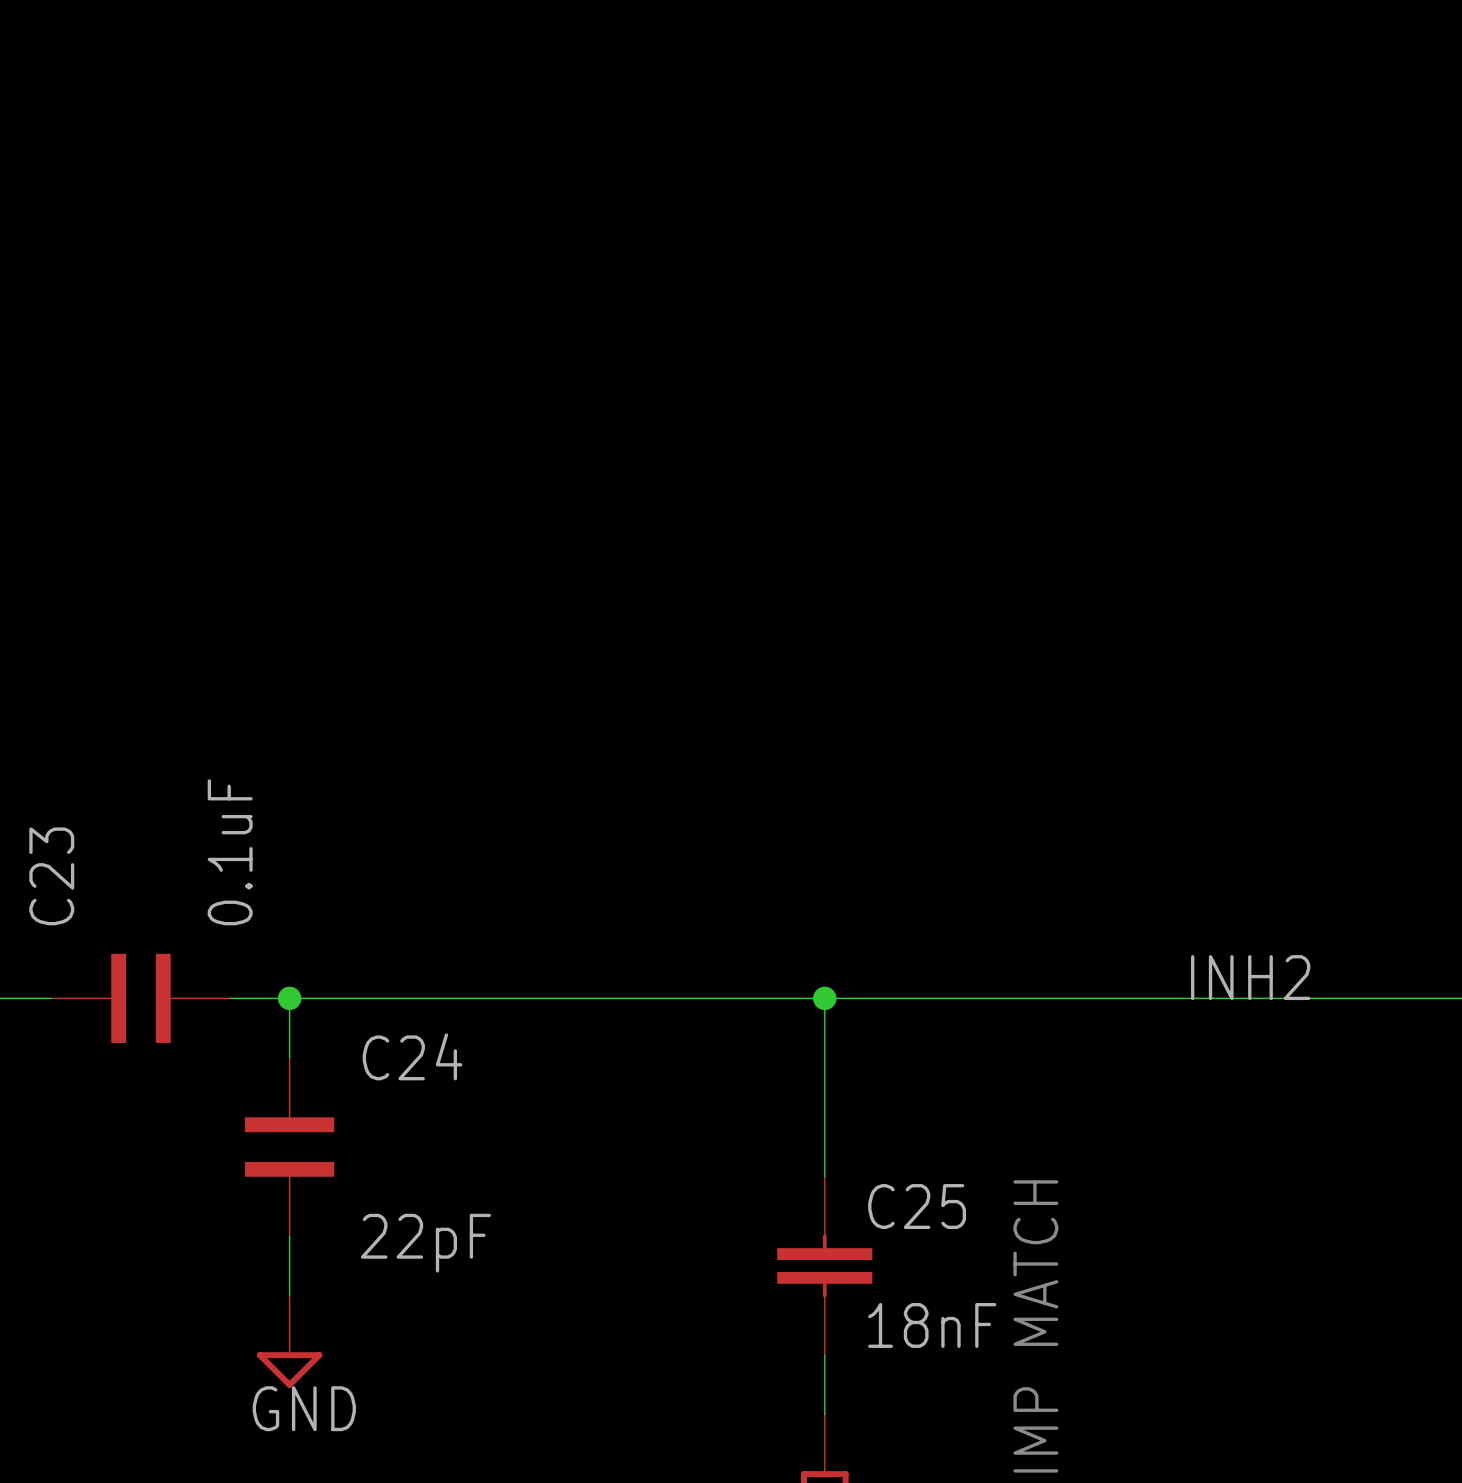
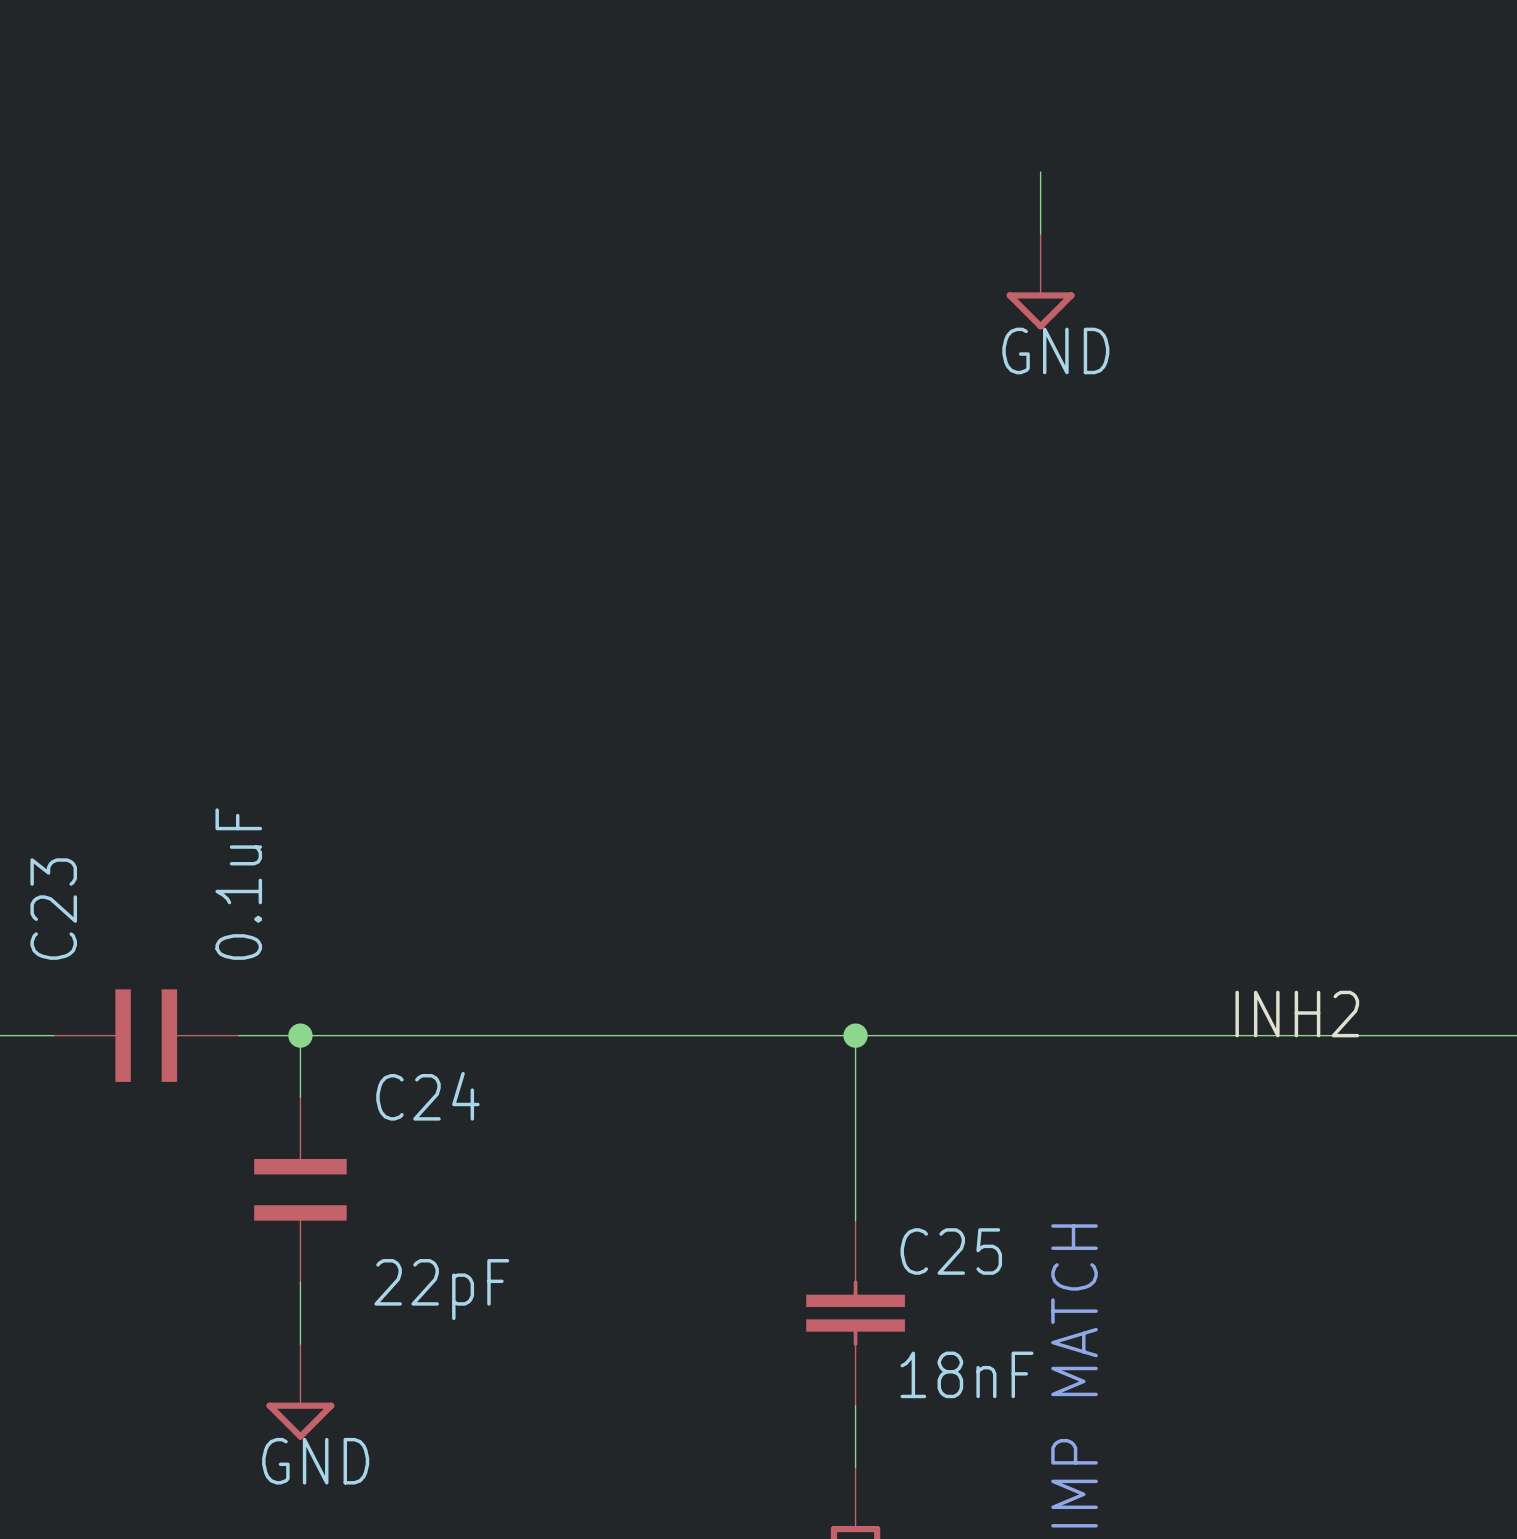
wire: none -> (1040, 172) (1040, 233)
power symbol: none -> GND (1040, 281)

